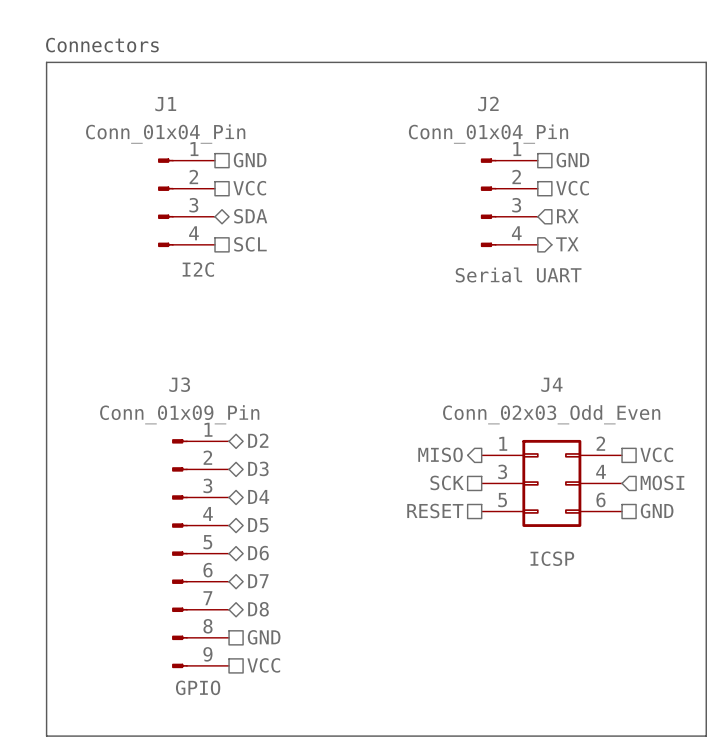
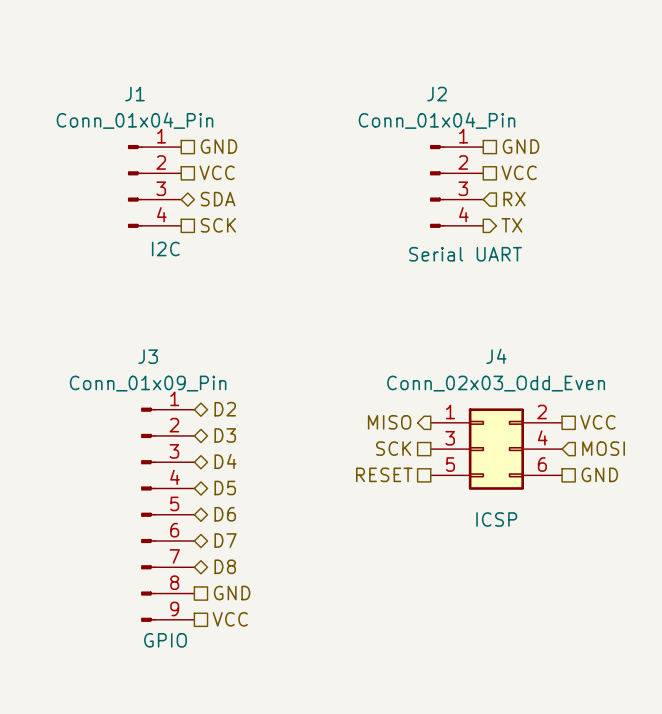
text: Connectors (102, 45) -> none
line: (46, 62) (46, 736) (706, 736) (706, 62) (46, 62) -> none
hierarchical label: SCL (250, 244) -> SCK (218, 225)

